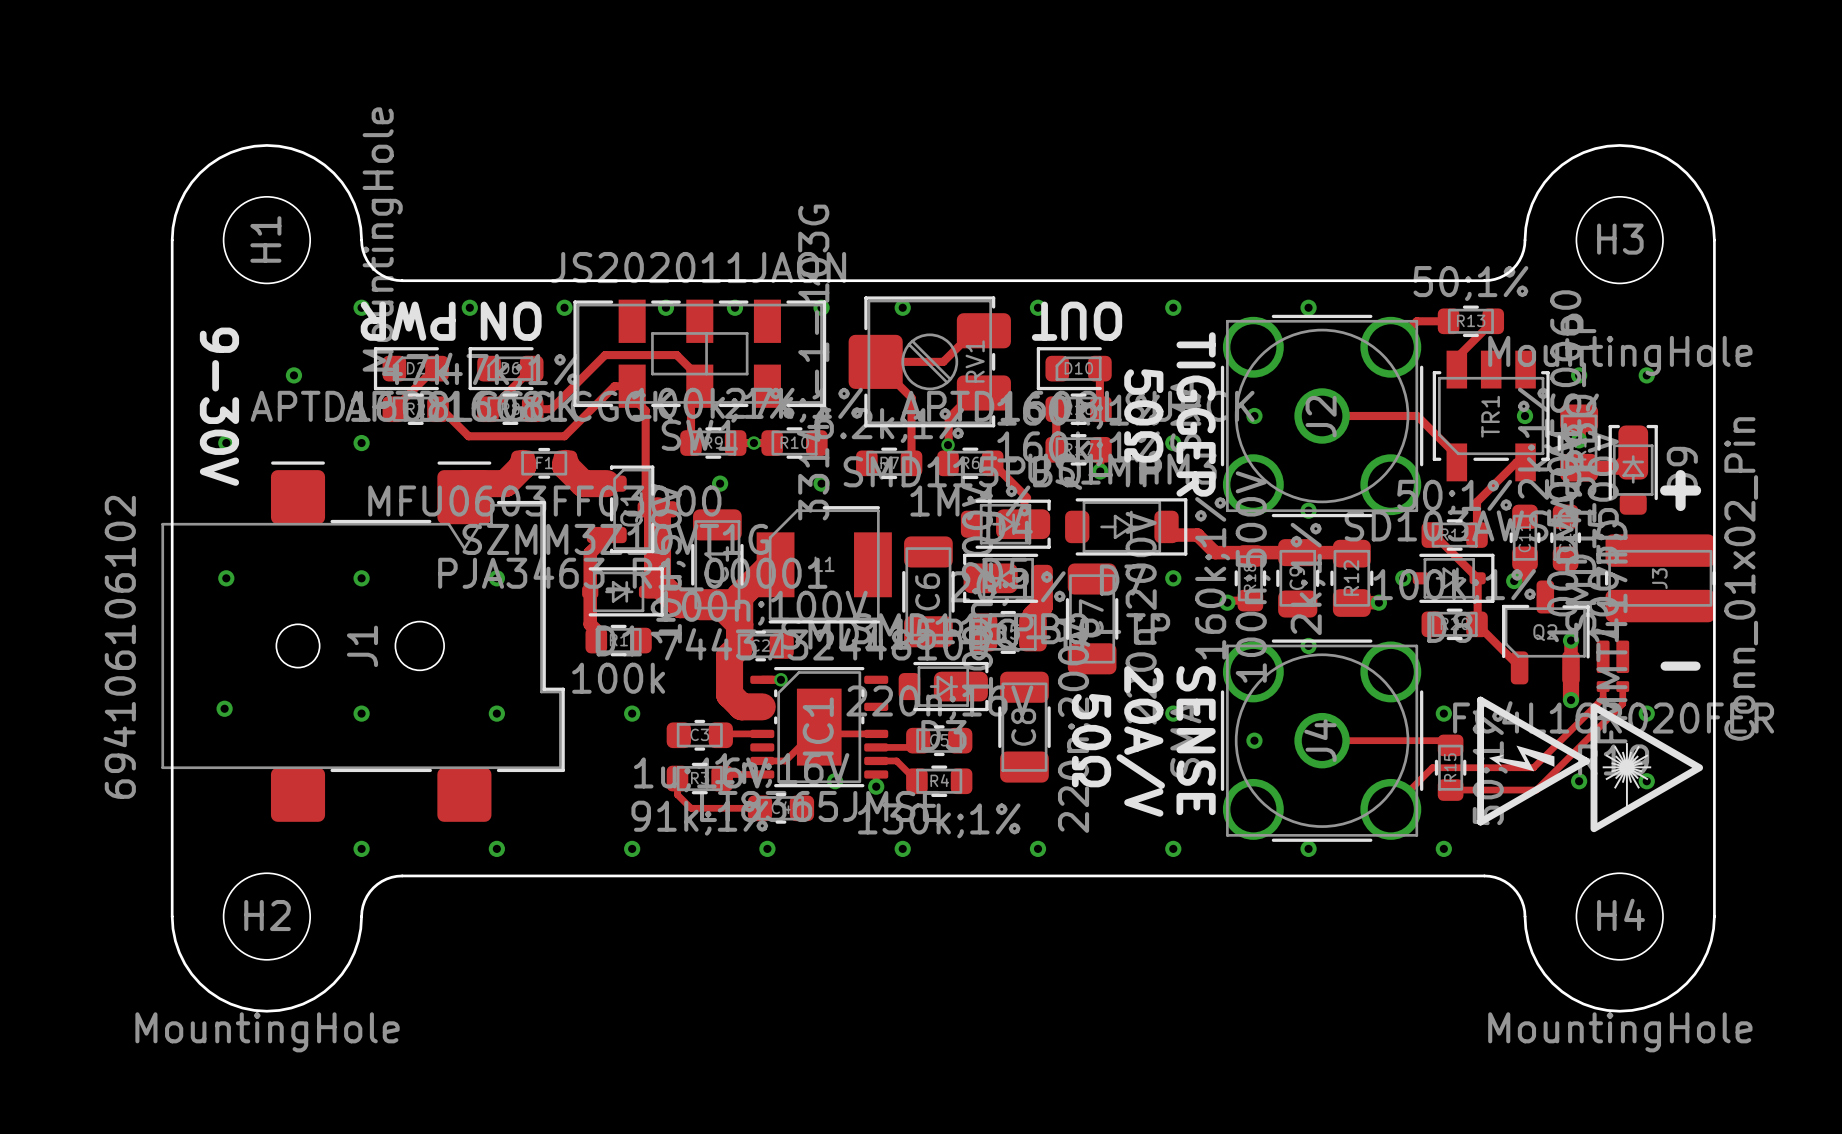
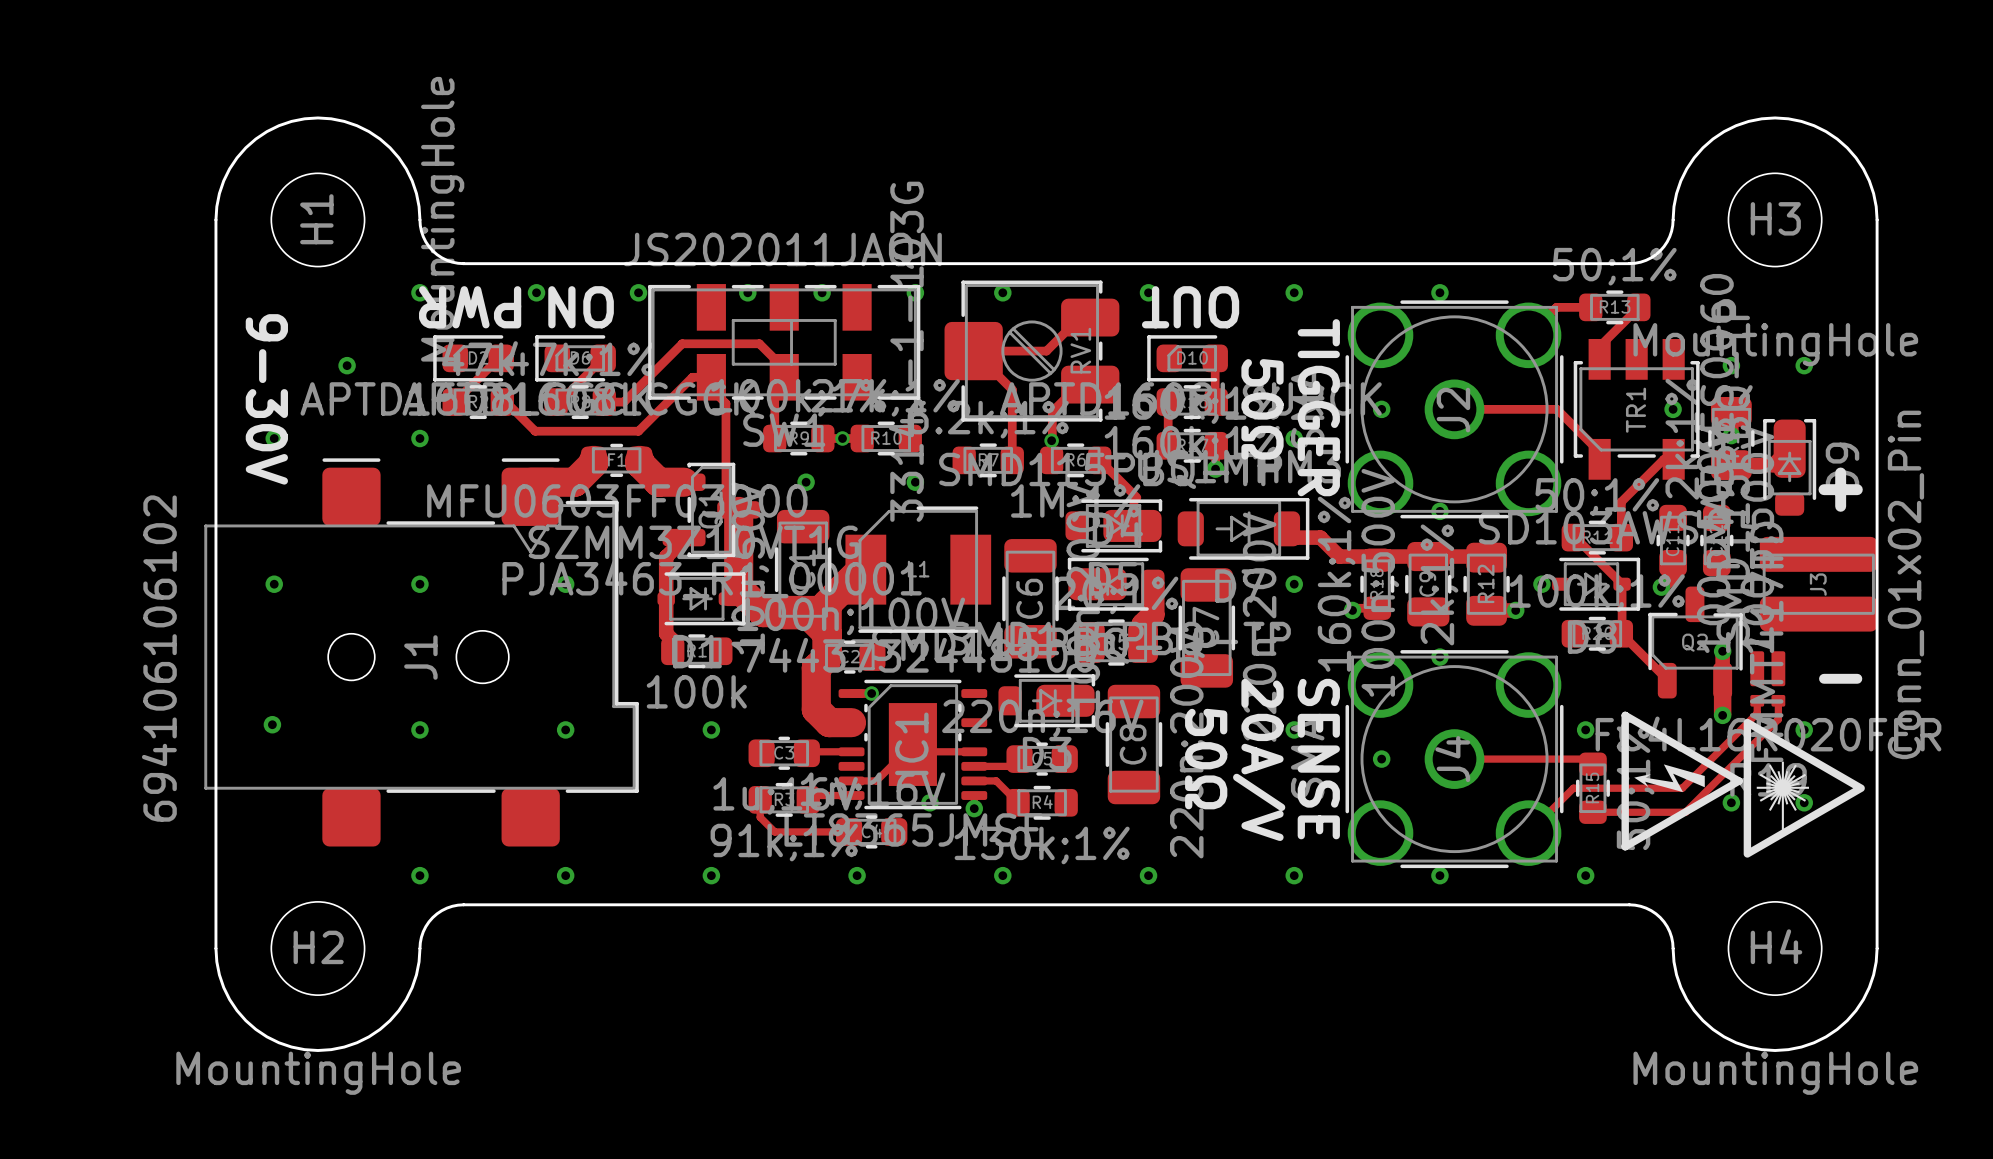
J3 footprint: [1604, 534, 1716, 623] -> [1759, 536, 1878, 632]

